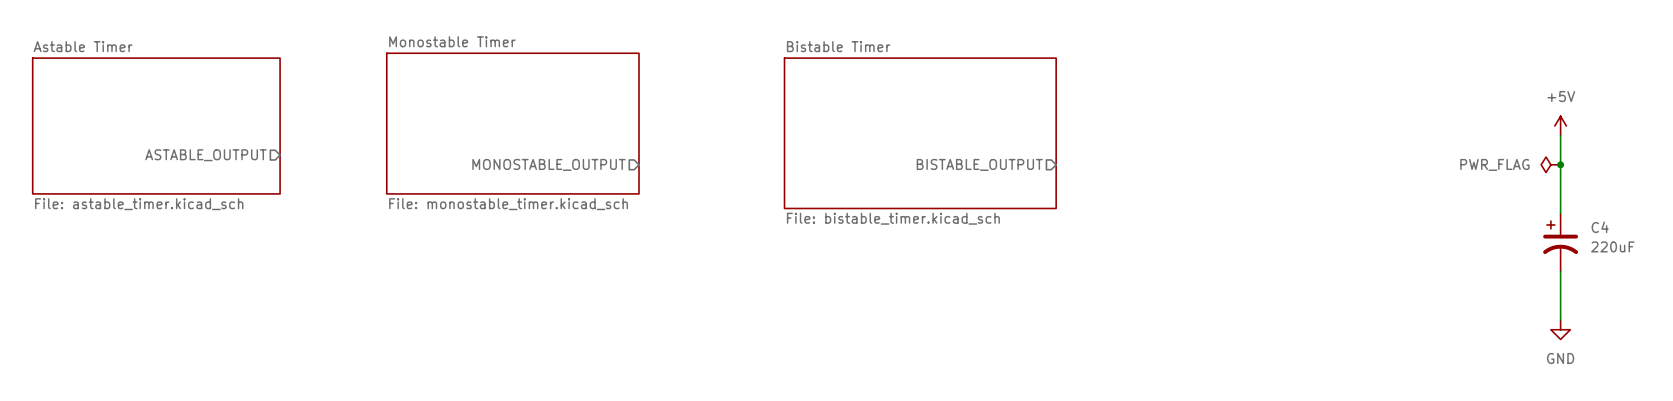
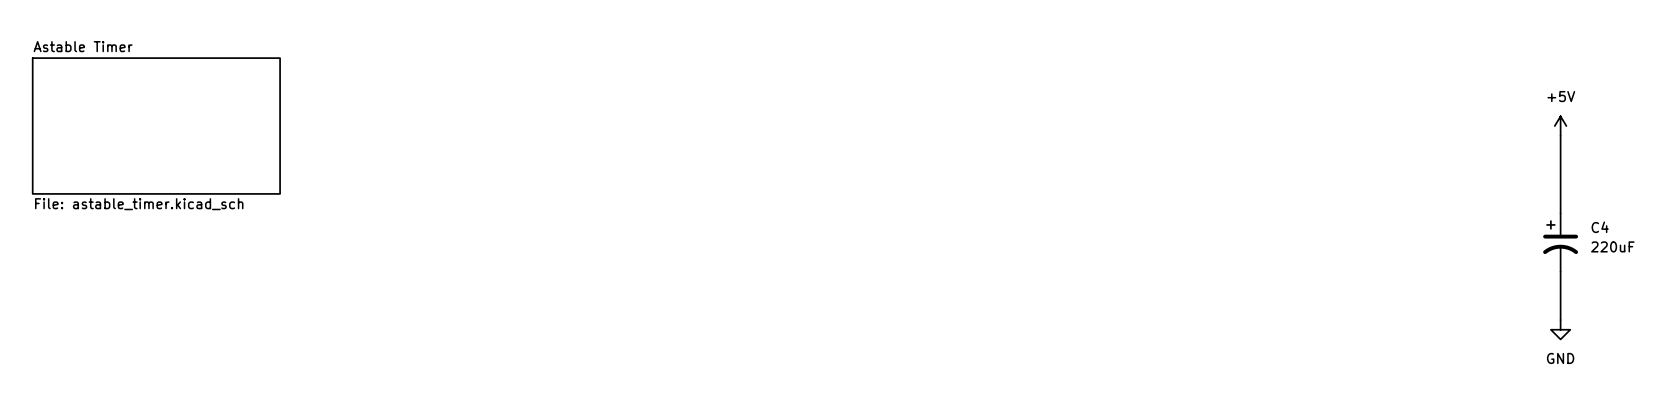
sheet Monostable Timer: File: monostable_timer.kicad_sch (512, 123) -> none
sheet Bistable Timer: File: bistable_timer.kicad_sch (920, 133) -> none
sheet pin: ASTABLE_OUTPUT (206, 155) -> none
sheet pin: MONOSTABLE_OUTPUT (549, 164) -> none
sheet pin: BISTABLE_OUTPUT (979, 164) -> none
power symbol: PWR_FLAG (1550, 164) -> none
junction: (1560, 164) -> none

